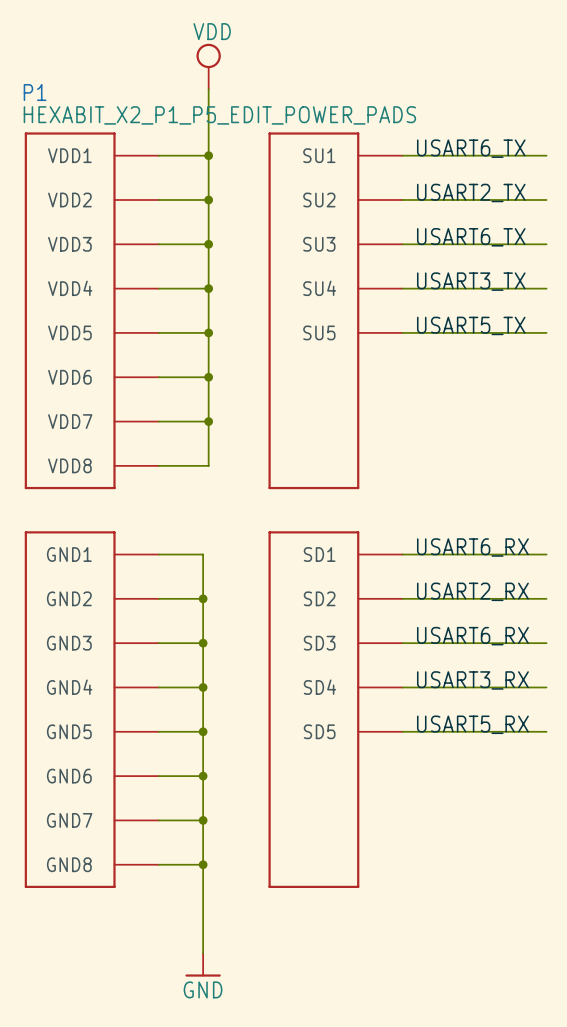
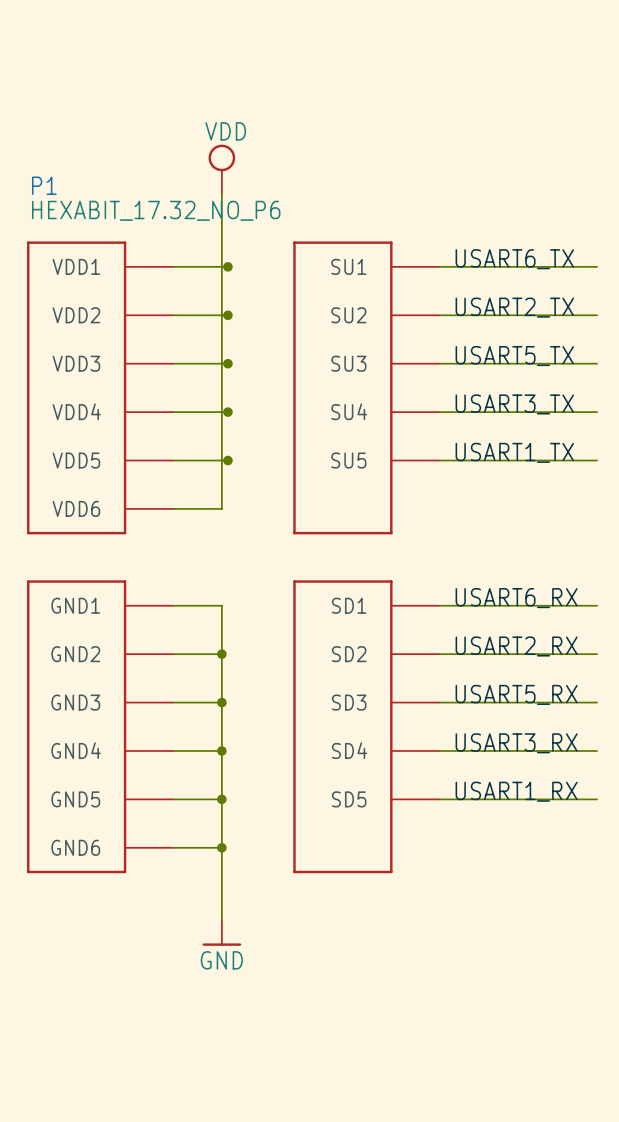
power symbol position: VDD (208, 66) -> VDD (221, 169)
wire: (208, 89) (208, 465) (203, 465) -> (221, 194) (221, 508)
P1 name position: P1 (35, 92) -> P1 (44, 185)
P1 value: HEXABIT_X2_P1_P5_EDIT_POWER_PADS (219, 115) -> HEXABIT_17.32_NO_P6 (156, 210)
P1 symbol: [24, 132, 403, 889] -> [27, 241, 440, 874]
label: USART6_TX (471, 148) -> none
wire: (158, 155) (208, 155) -> none
junction: (208, 155) -> none
wire: (402, 155) (546, 155) -> none
label: USART2_TX (471, 192) -> none
wire: (158, 199) (208, 199) -> none
junction: (208, 199) -> none
wire: (402, 199) (546, 199) -> (439, 412) (597, 412)
label: USART3_TX (471, 281) -> USART2_TX (514, 307)
label: none -> USART3_TX (514, 404)
label: none -> USART1_TX (514, 452)
wire: none -> (439, 460) (597, 460)
label: USART6_RX (472, 636) -> USART5_RX (516, 694)
label: USART5_RX (472, 724) -> USART1_RX (516, 791)
wire: (158, 820) (203, 820) -> none
junction: (203, 820) -> none
wire: (203, 842) (203, 953) -> none
wire: (158, 864) (203, 864) -> none
junction: (203, 864) -> none
power symbol position: GND (203, 965) -> GND (221, 933)

